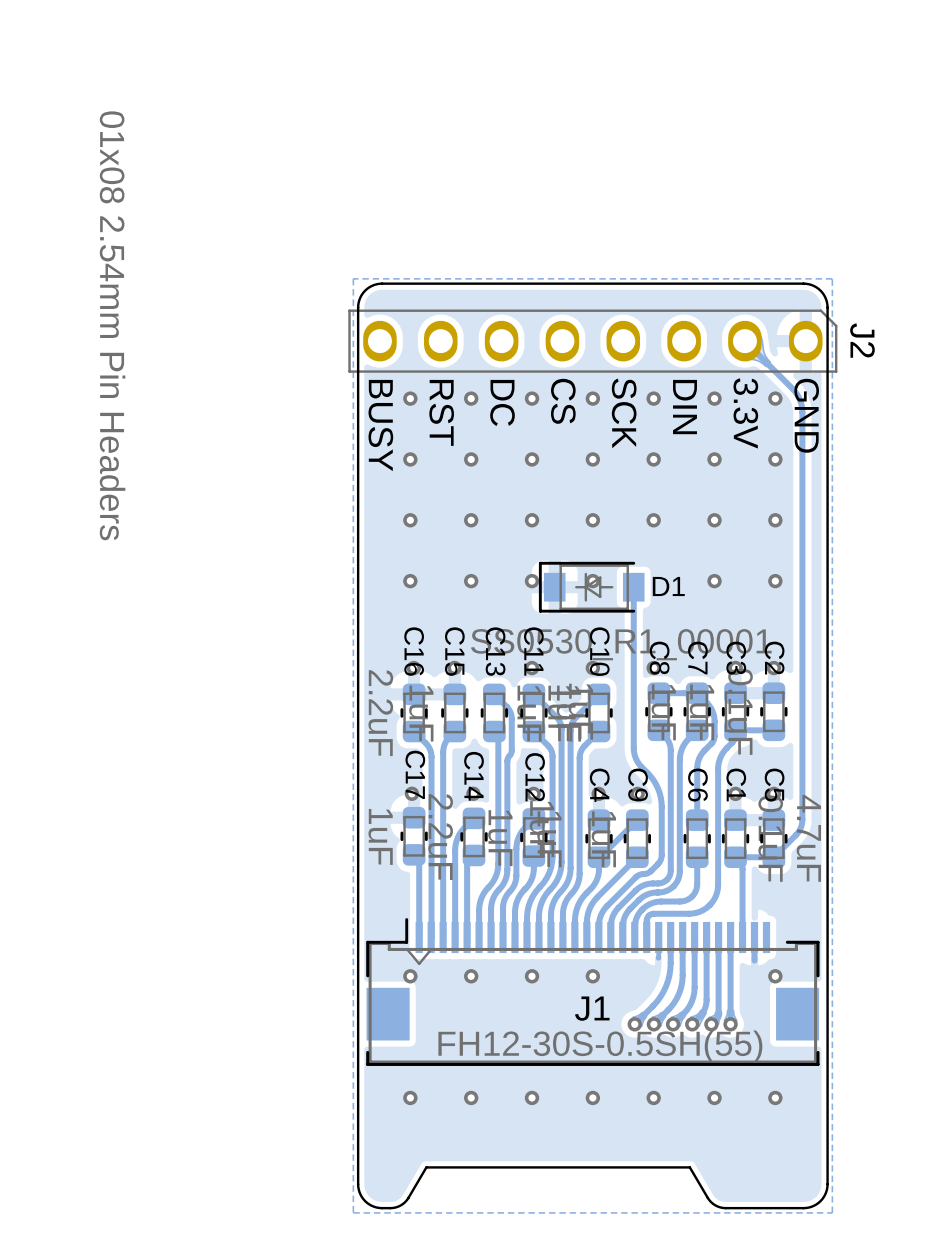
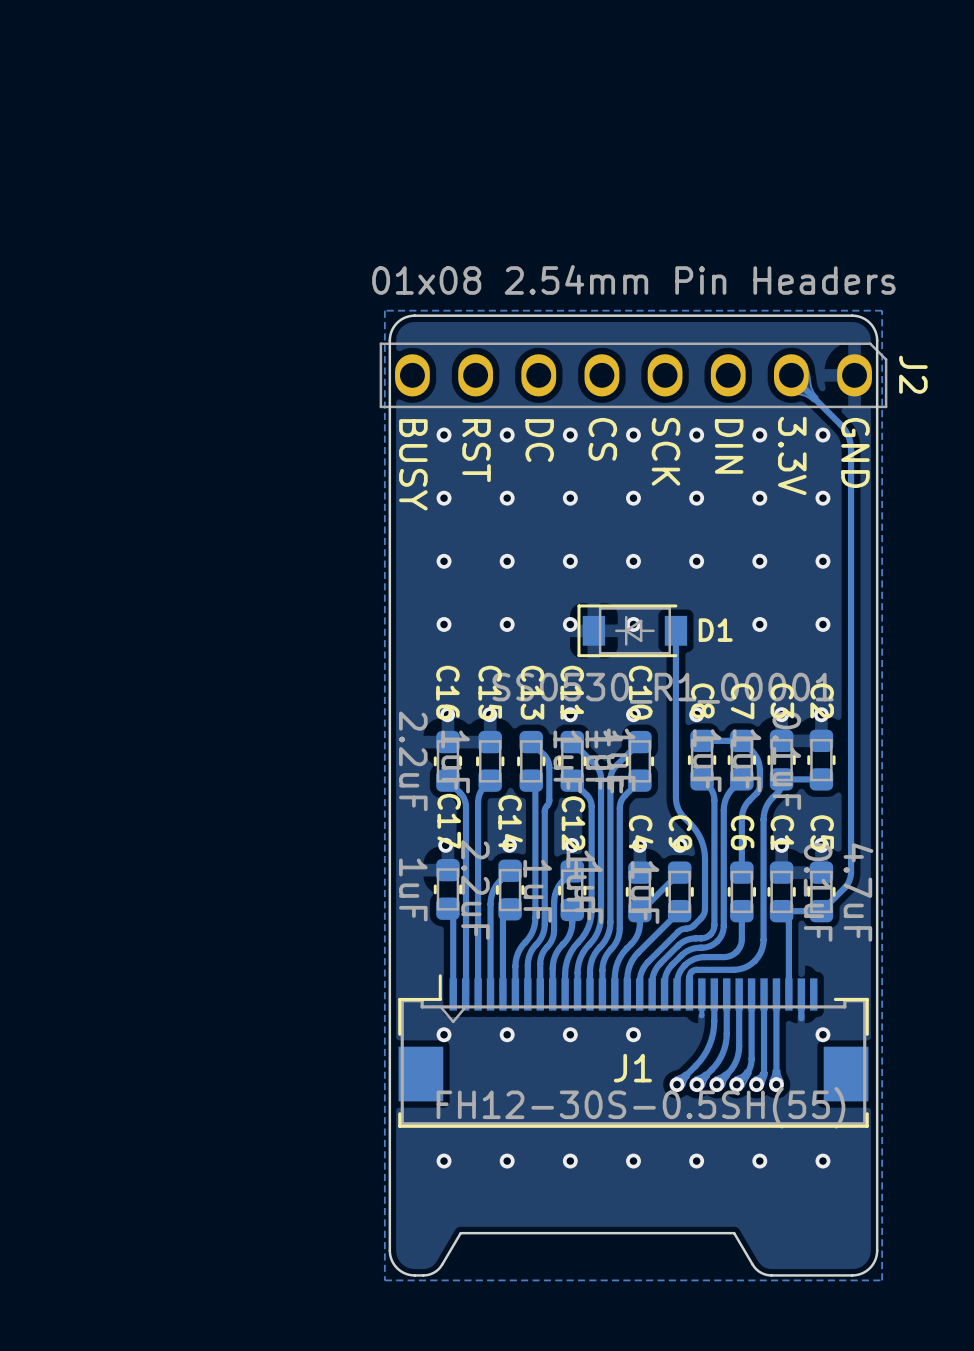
J2 value rotation: 0° (112, 325) -> 90° counterclockwise (633, 279)

